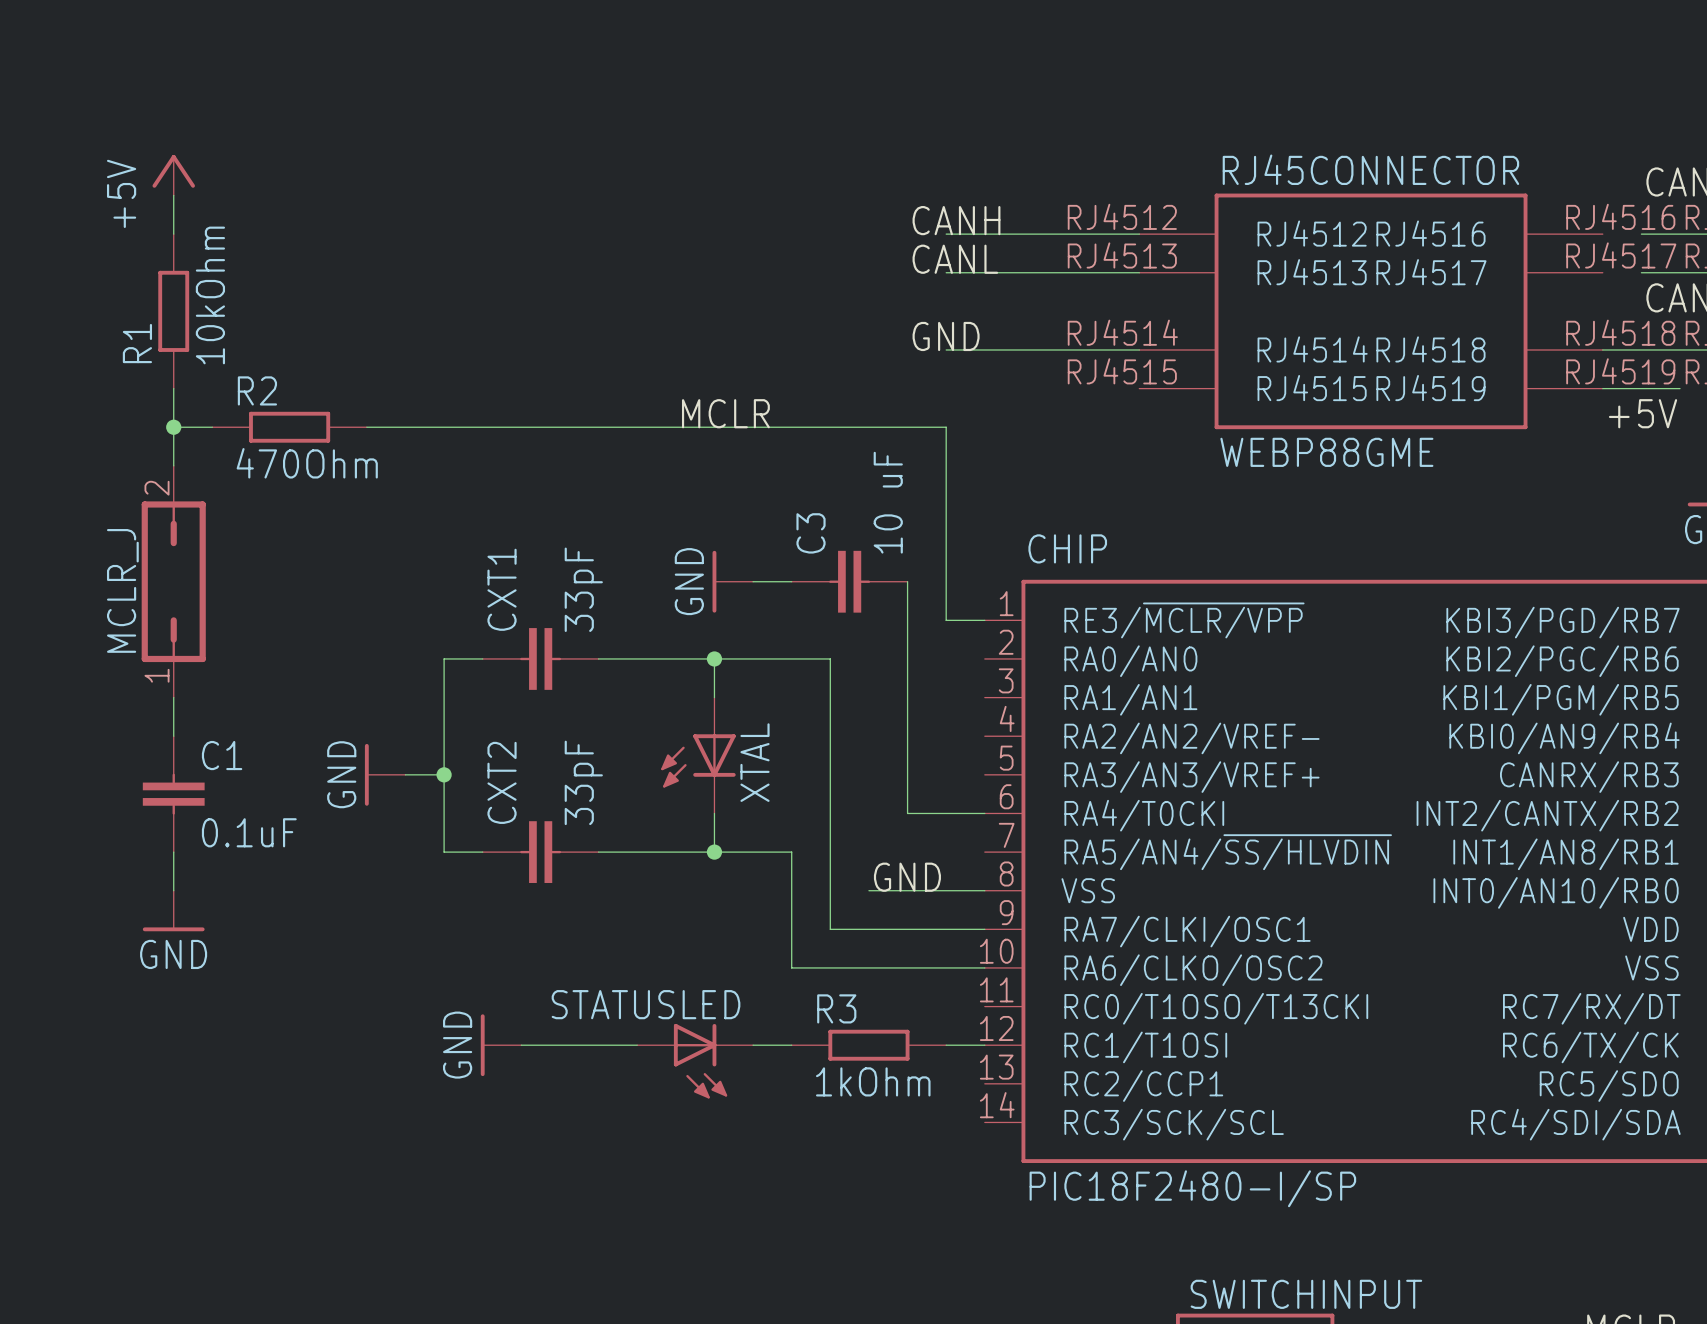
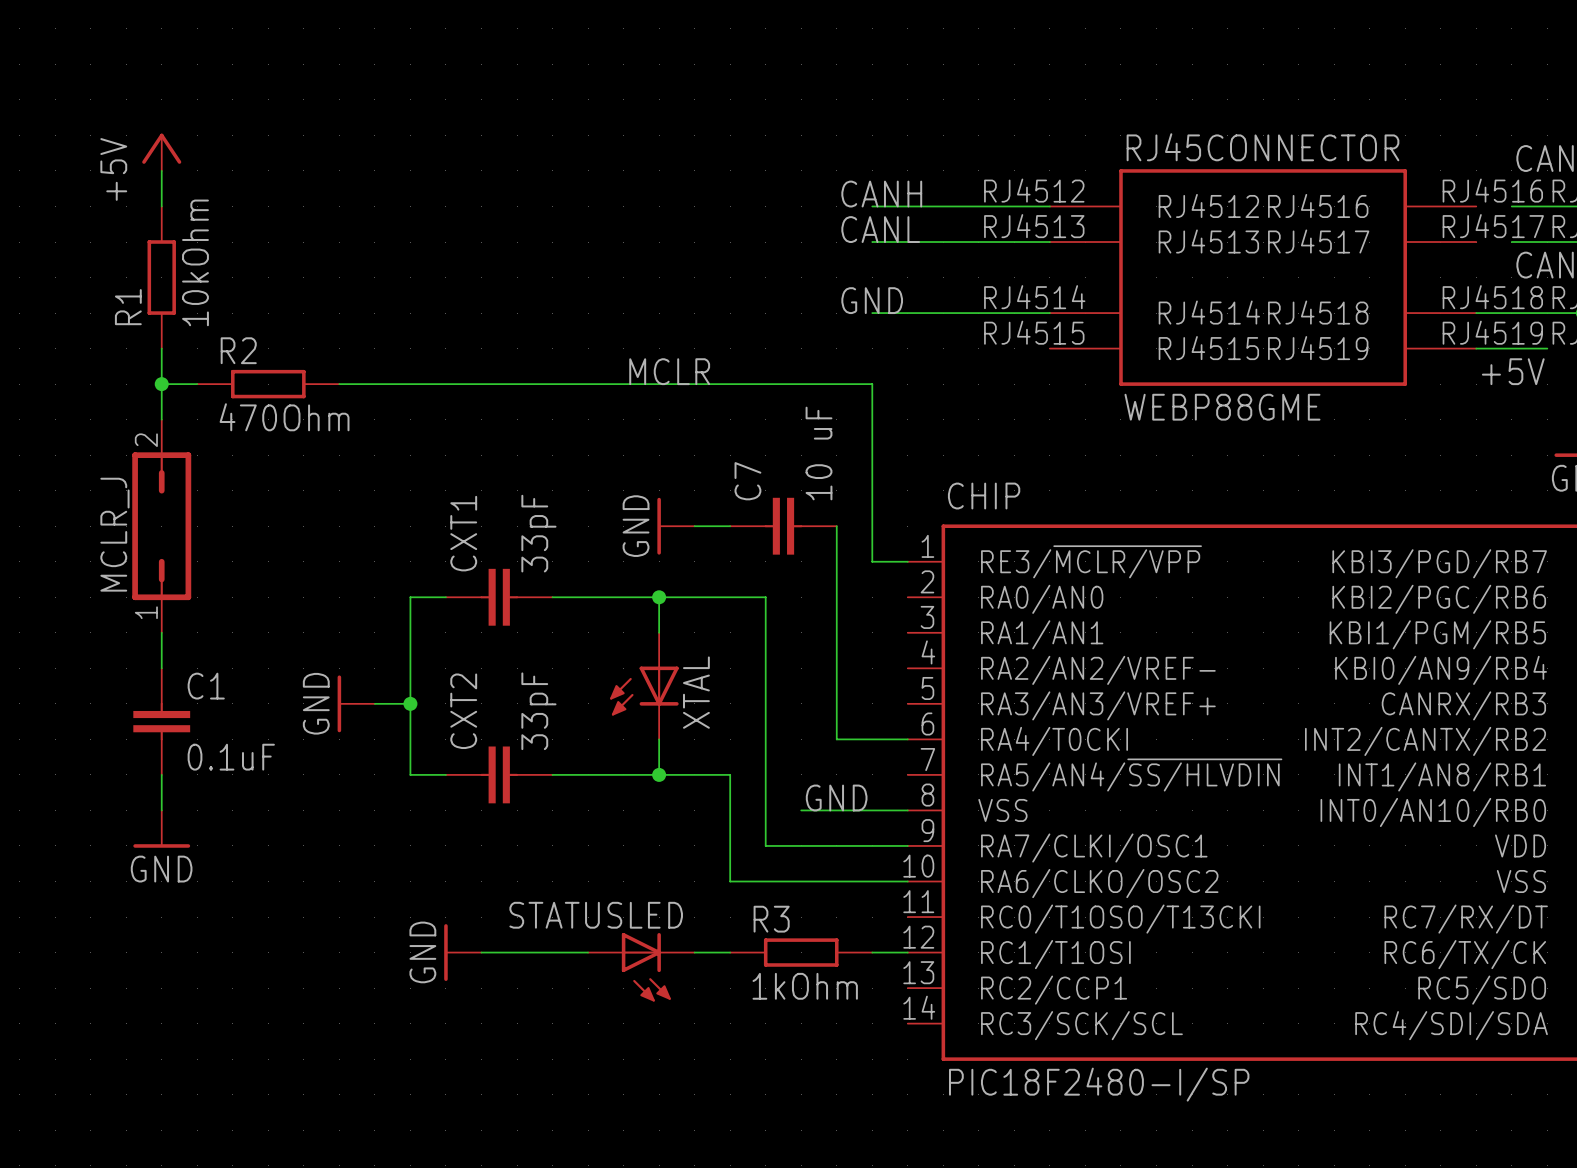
C3 name: C3 (811, 533) -> C7 (747, 481)

